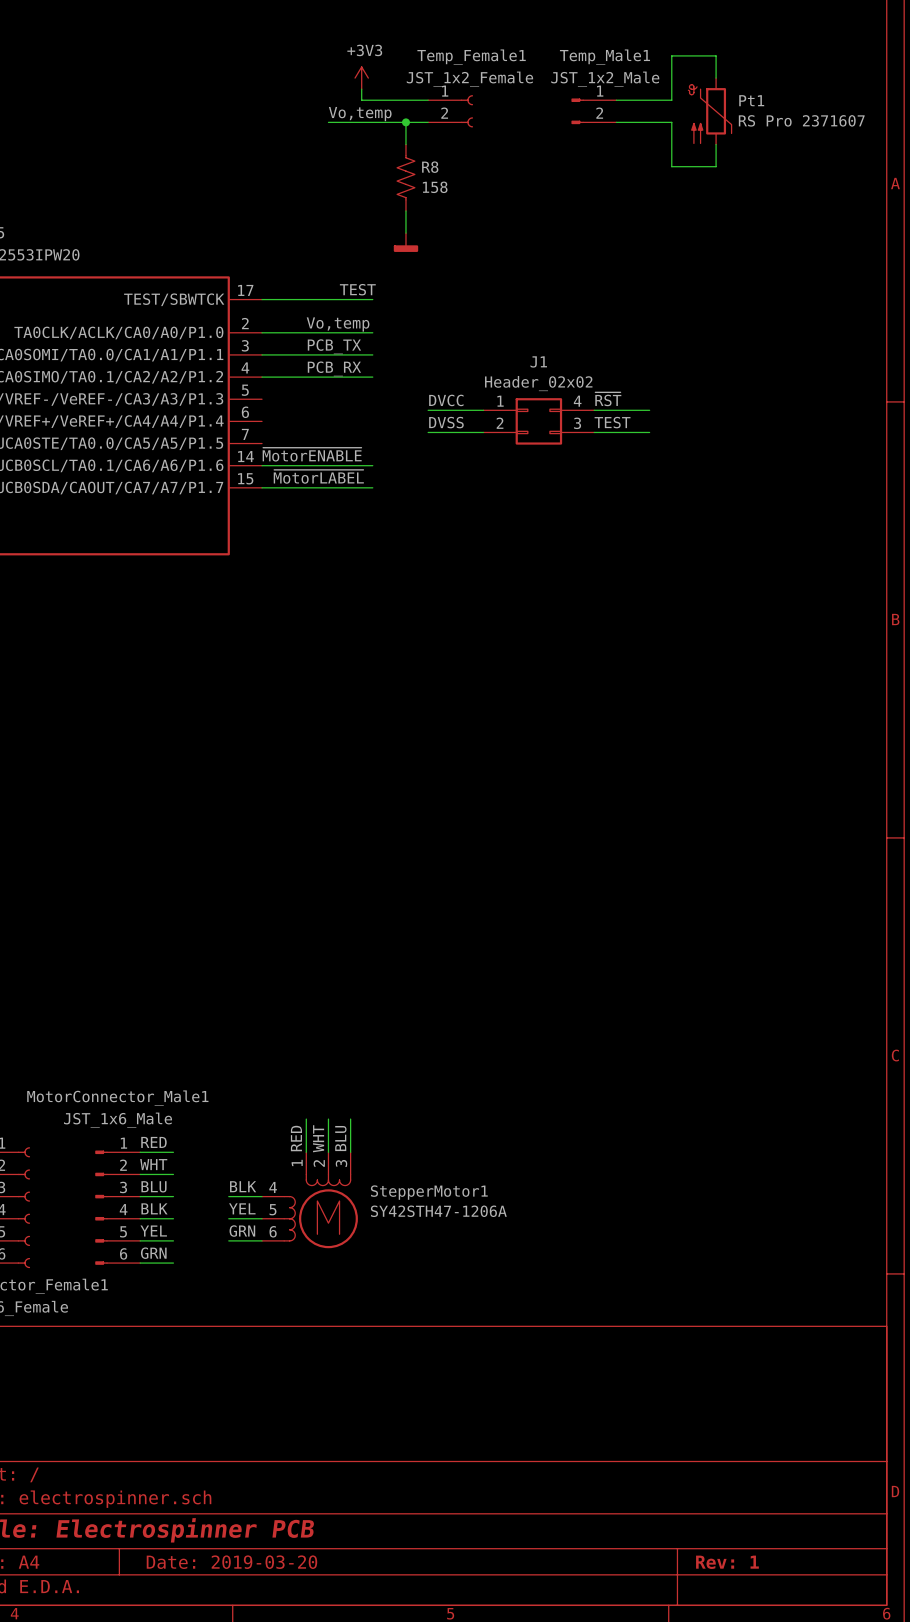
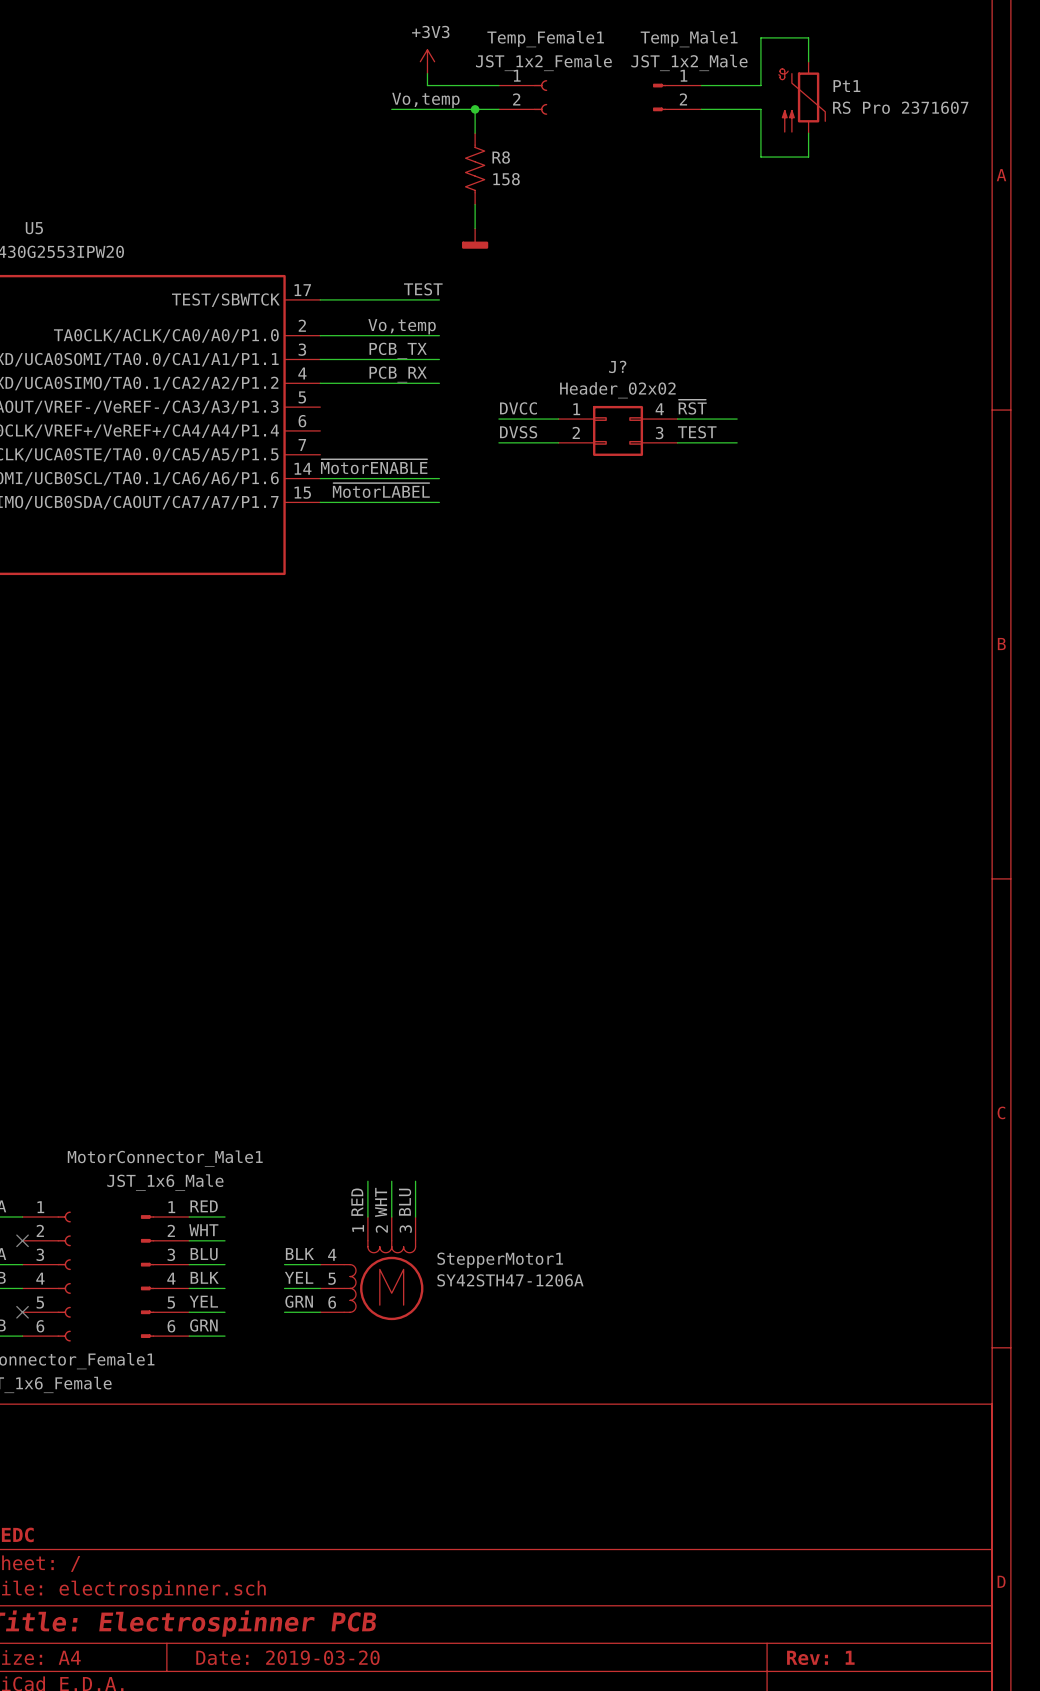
J1 name: J1 (538, 361) -> J? (617, 366)

